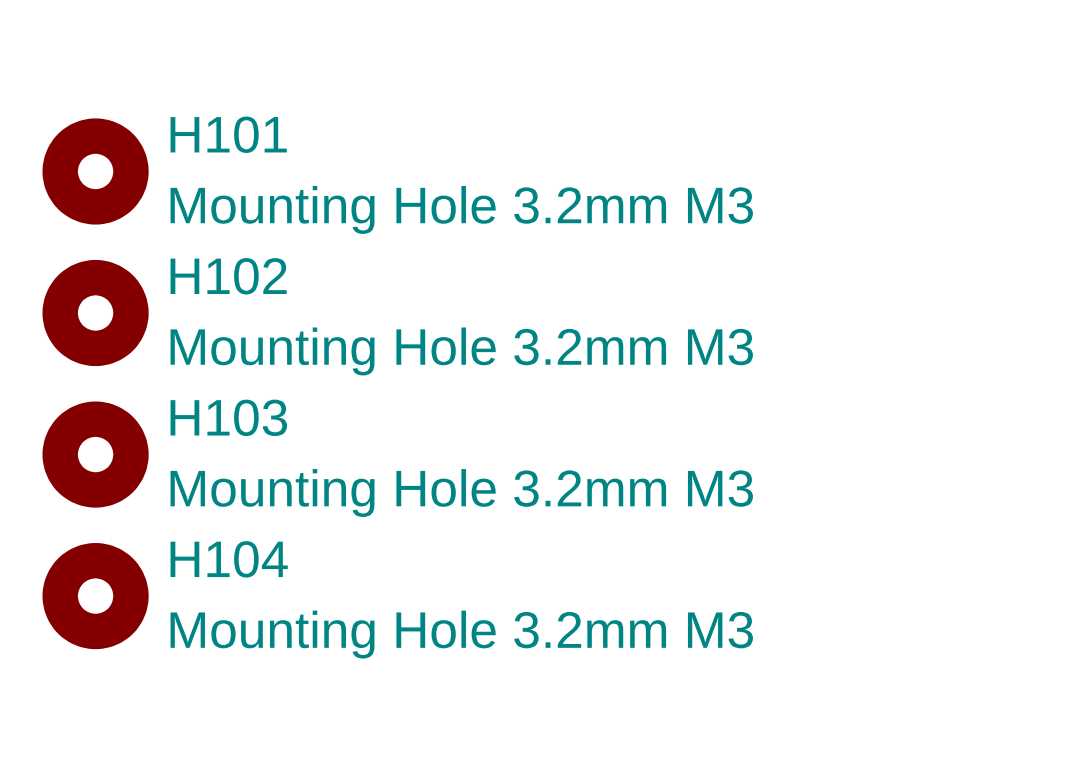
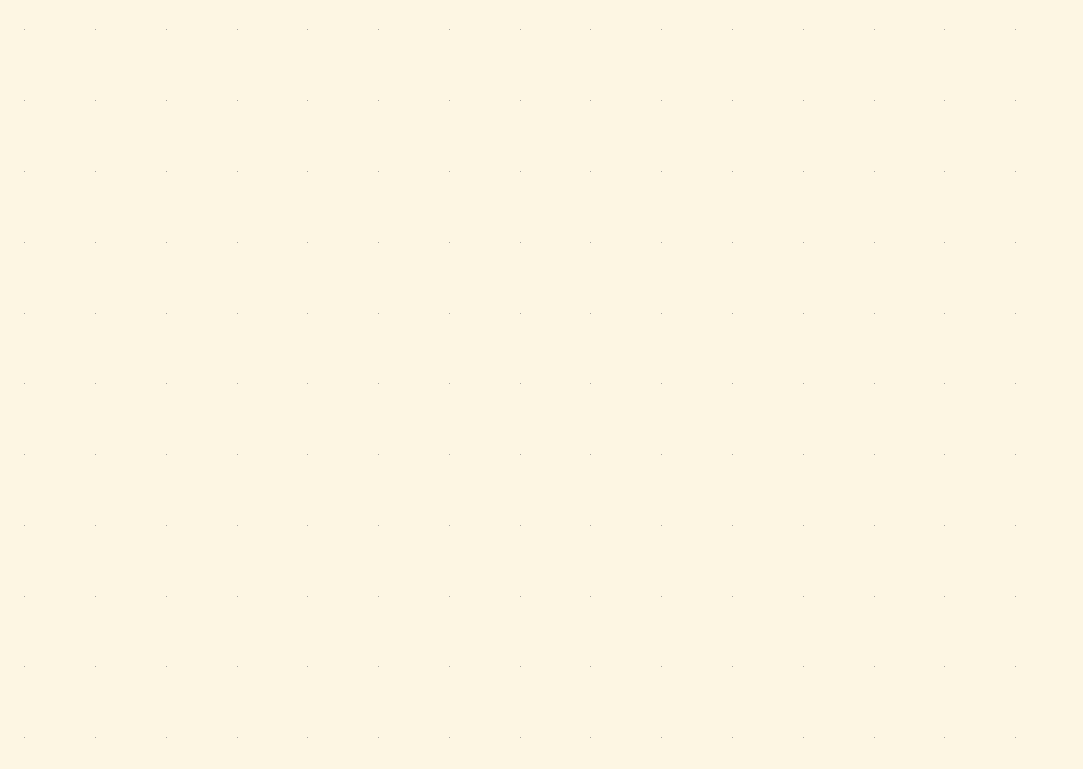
H101: Mounting Hole 3.2mm M3 (95, 171) -> none
H102: Mounting Hole 3.2mm M3 (95, 313) -> none
H103: Mounting Hole 3.2mm M3 (95, 454) -> none
H104: Mounting Hole 3.2mm M3 (95, 596) -> none

